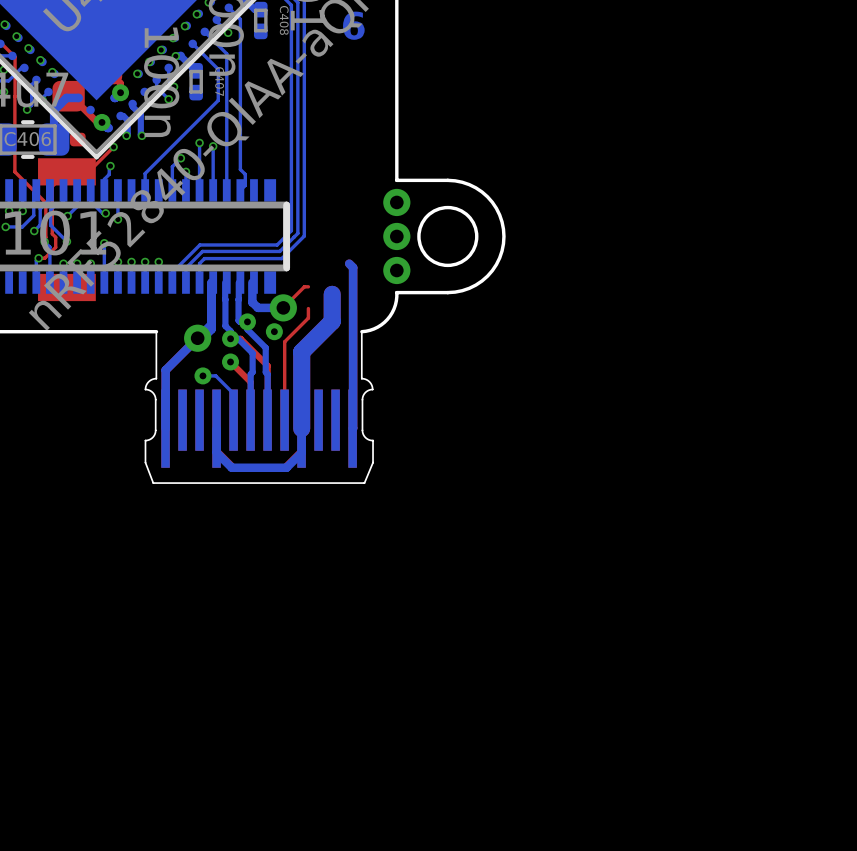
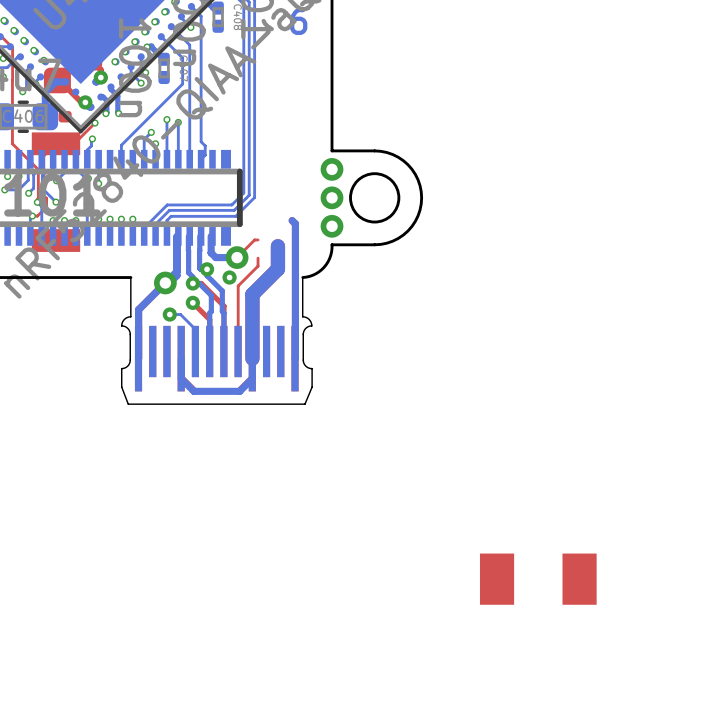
part: none -> (538, 579)

